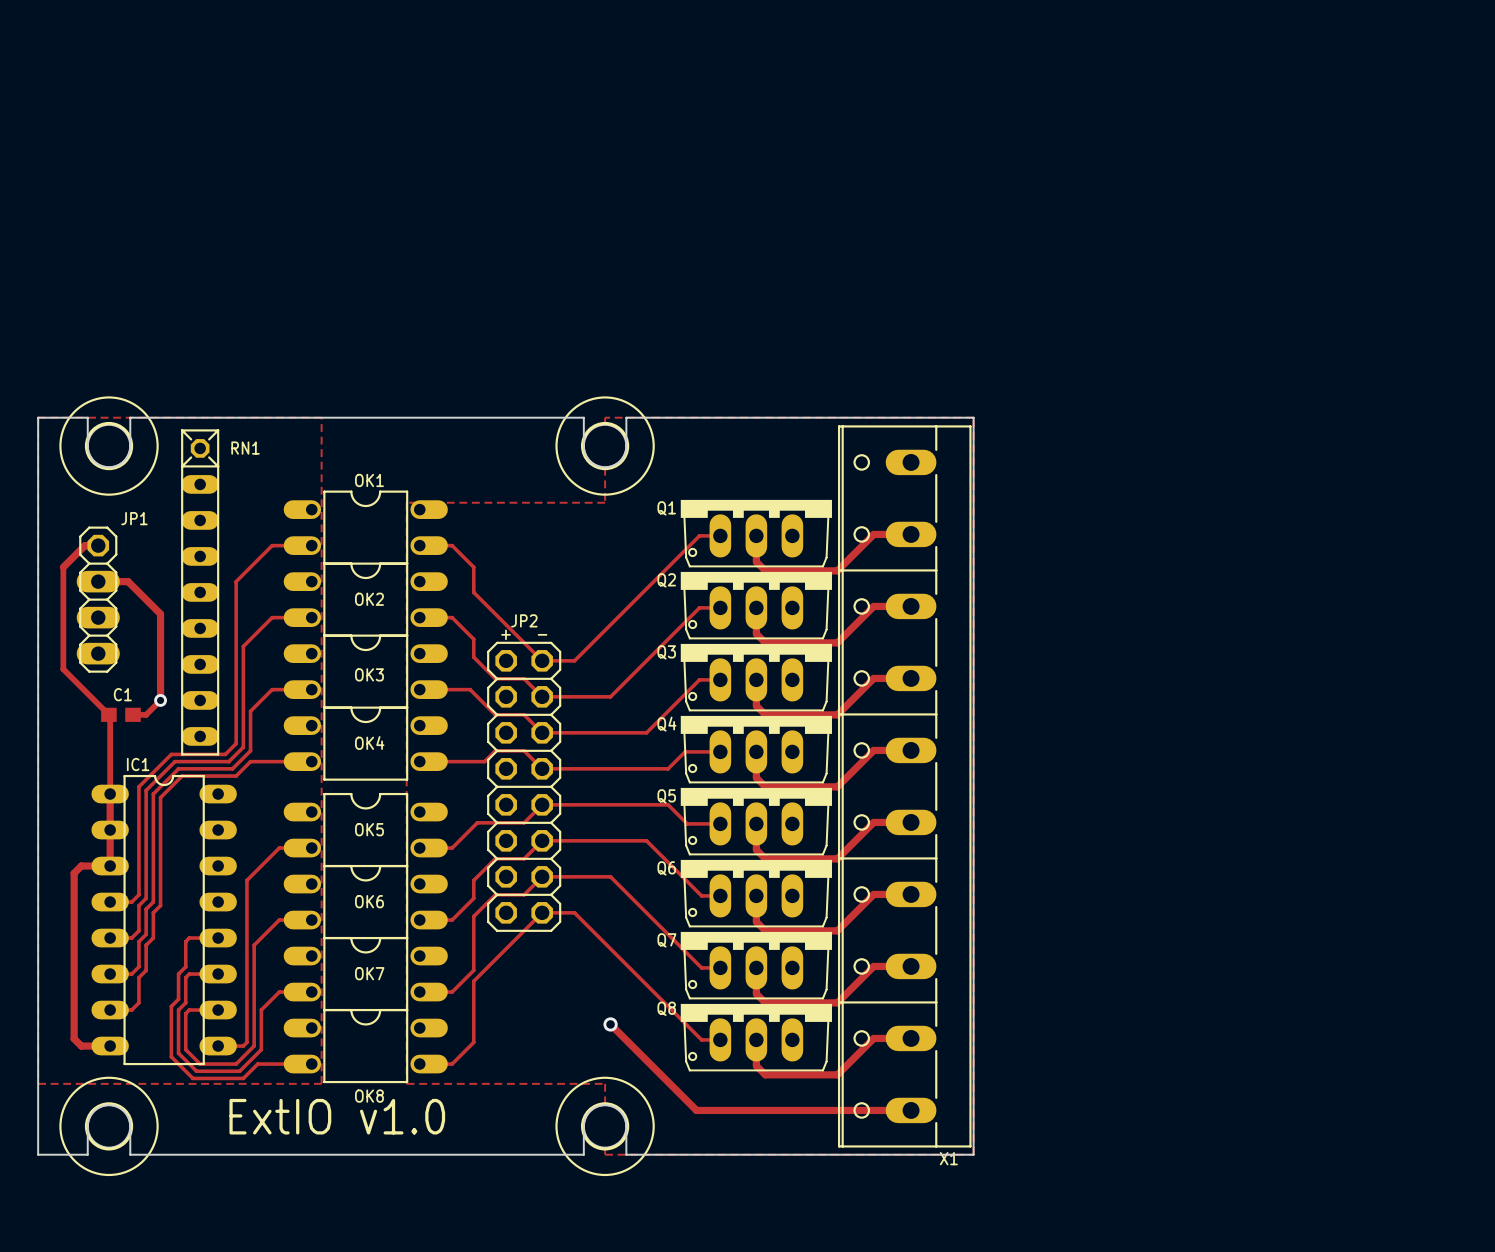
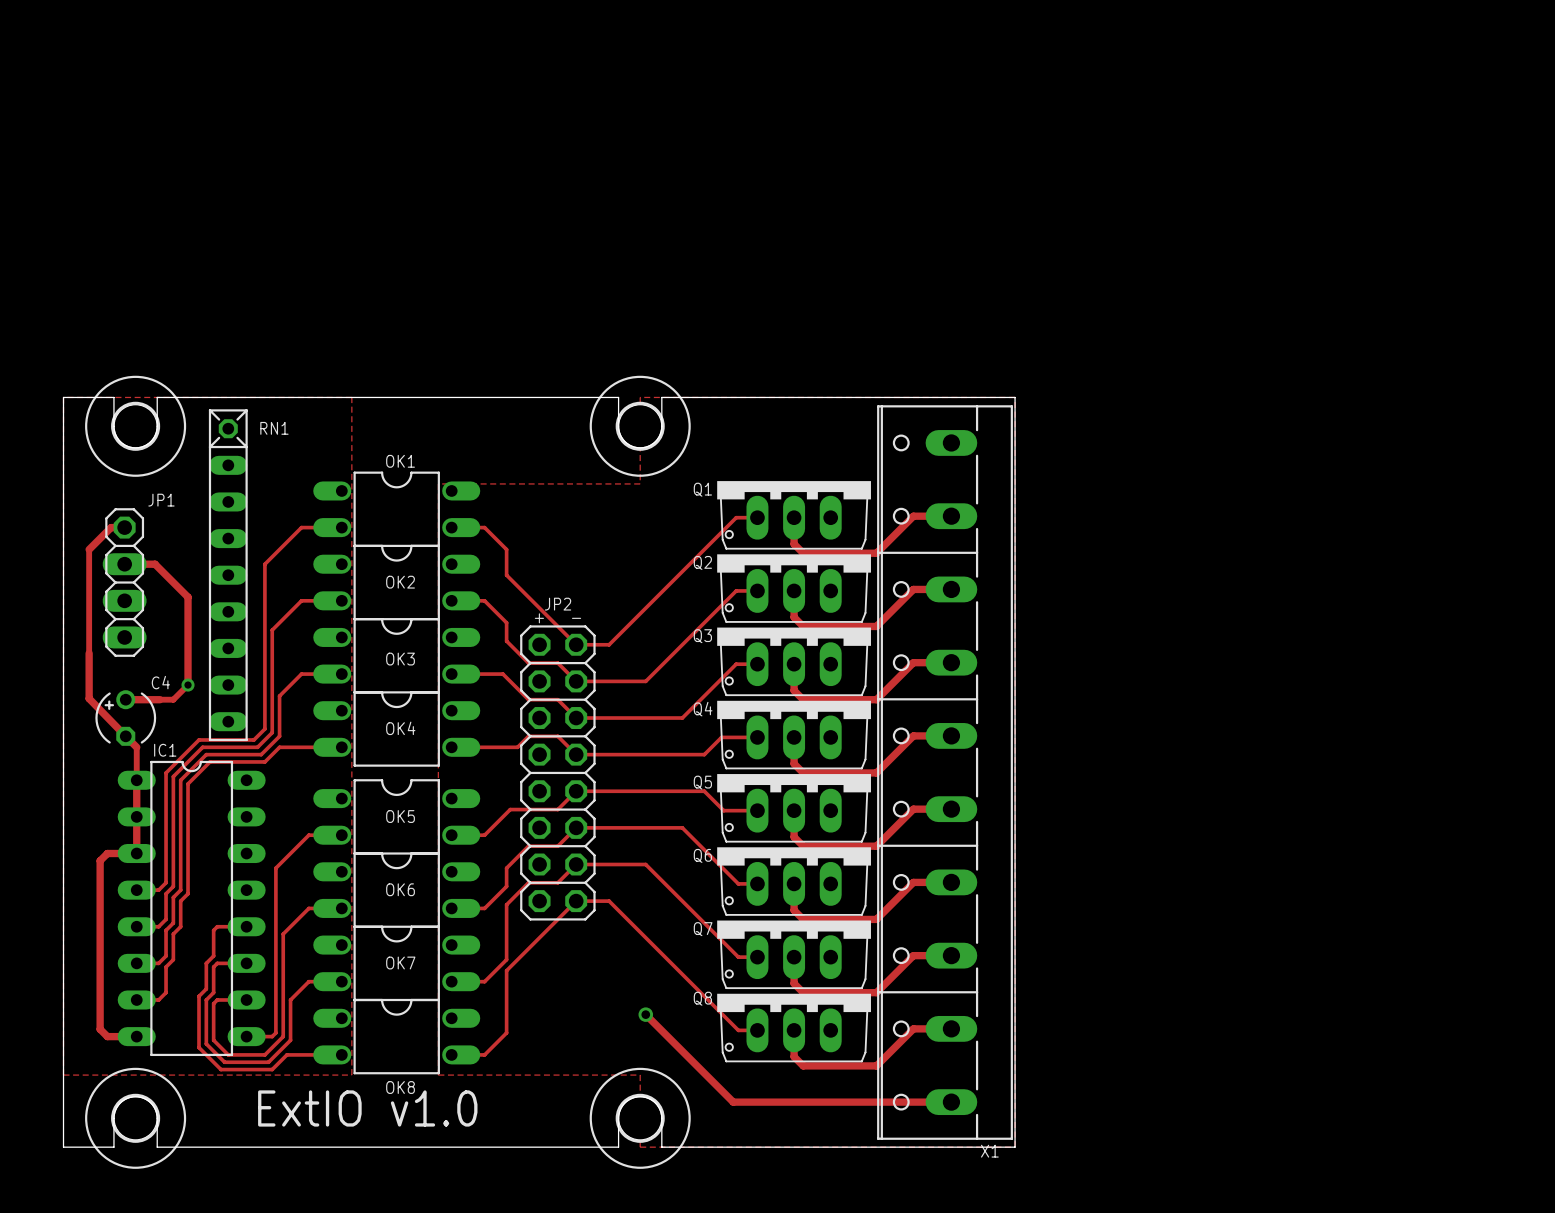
track: (63, 669) (110, 716) (110, 761) -> (89, 653) (89, 698) (136, 747)
track: none -> (125, 699) (159, 699)
C1: (120, 714) -> none
C4: none -> (125, 718)

